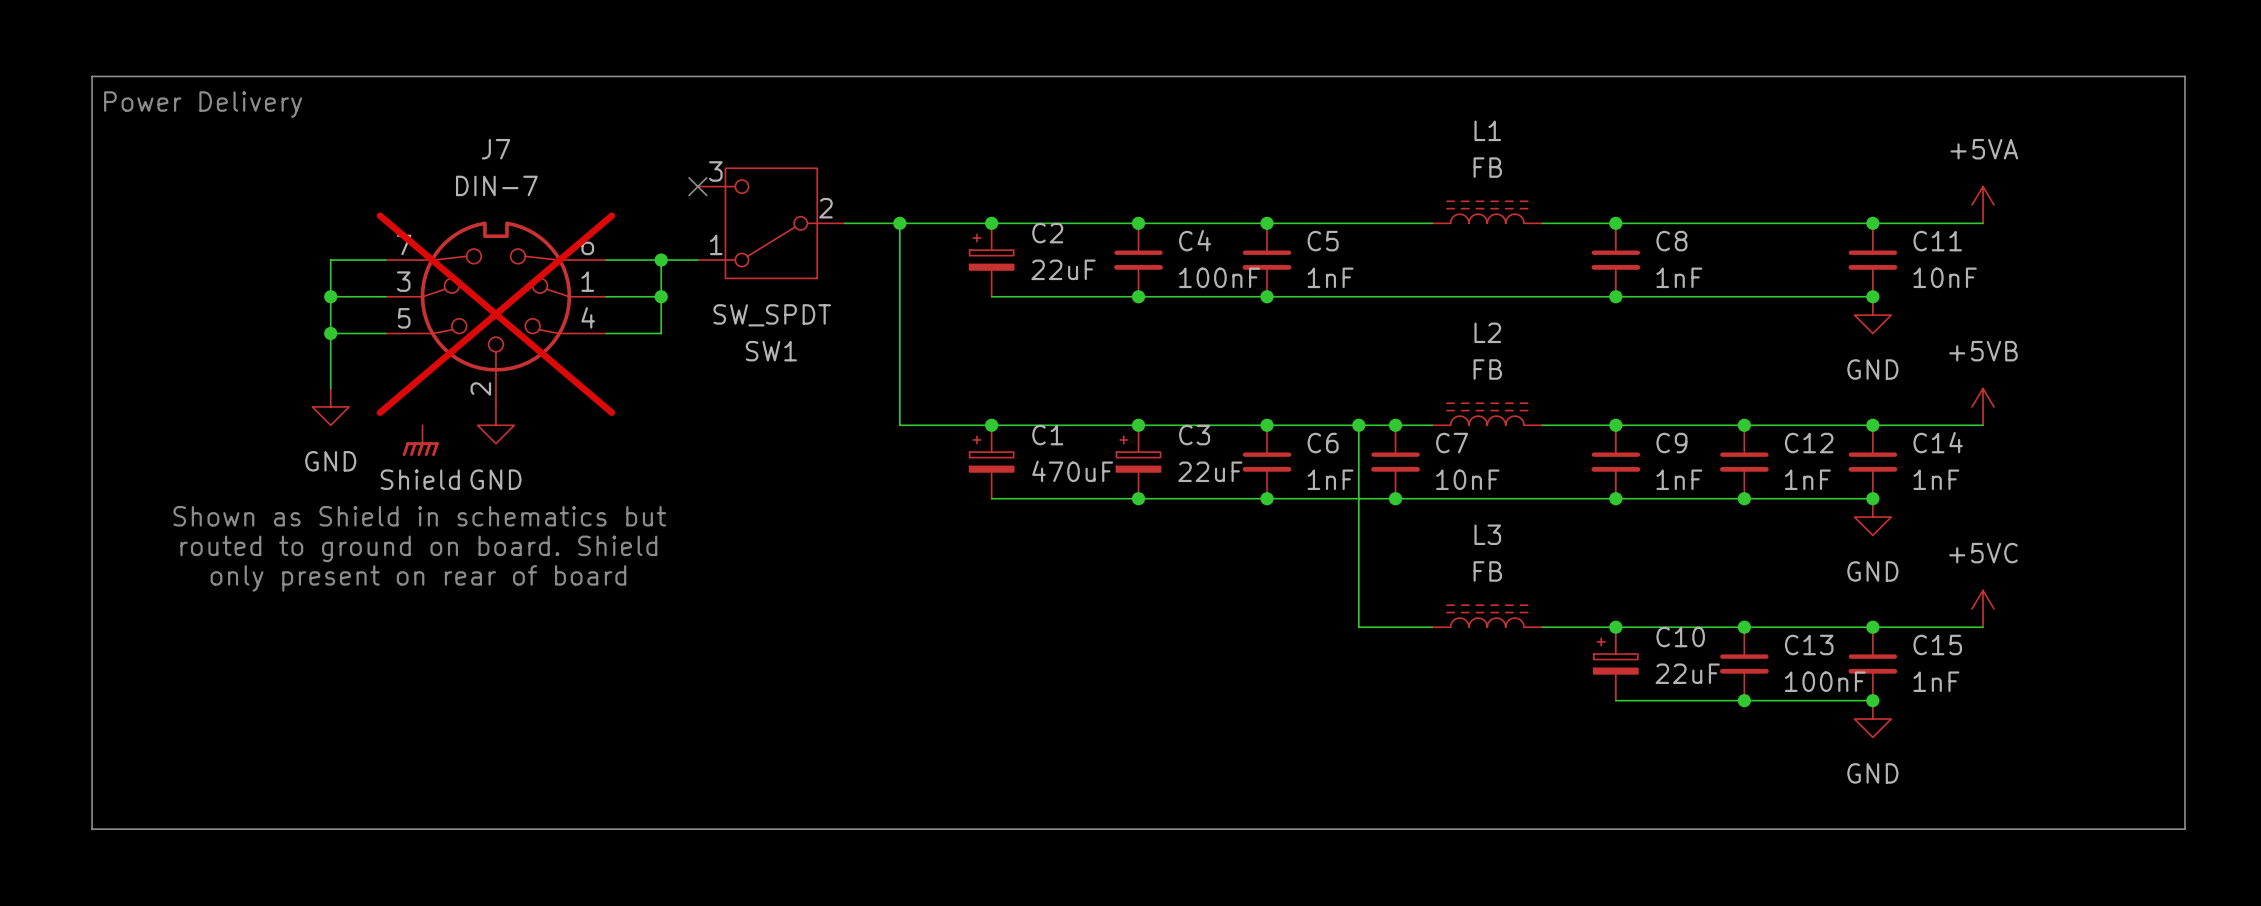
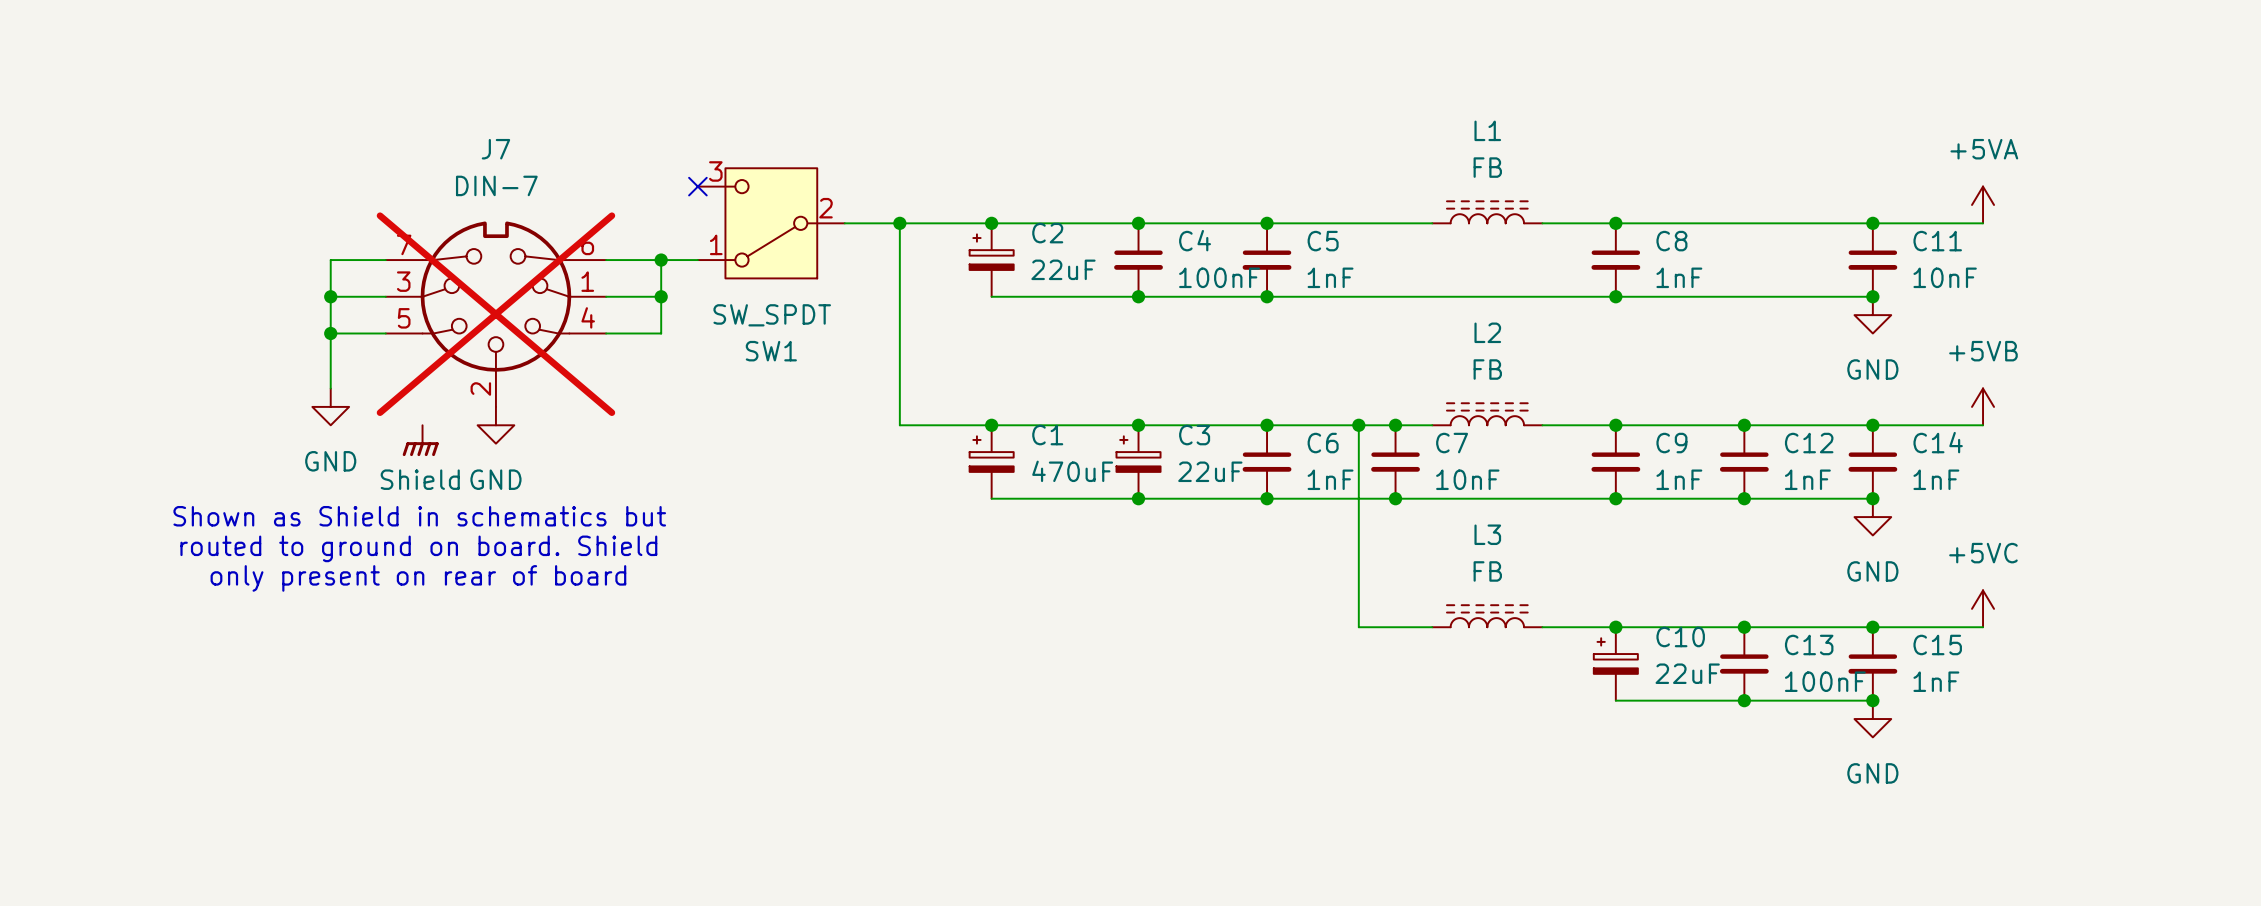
line: (92, 76) (2184, 76) (2184, 829) (92, 829) (92, 76) -> none
text: Power Delivery (203, 104) -> none

